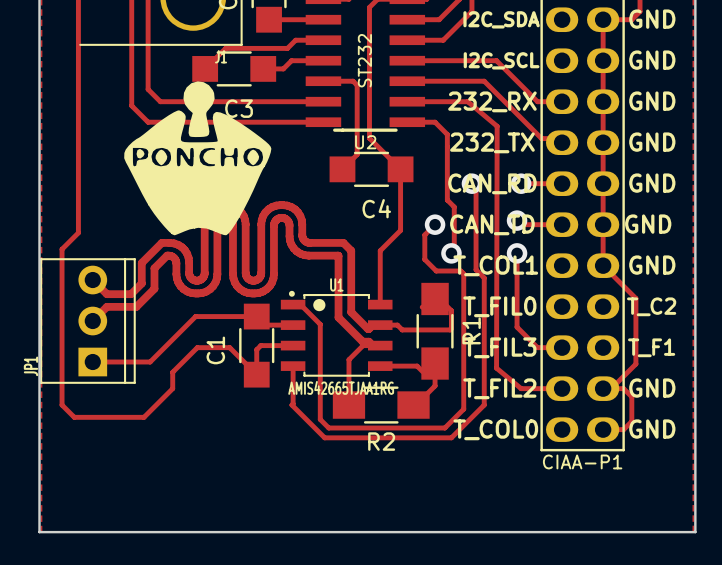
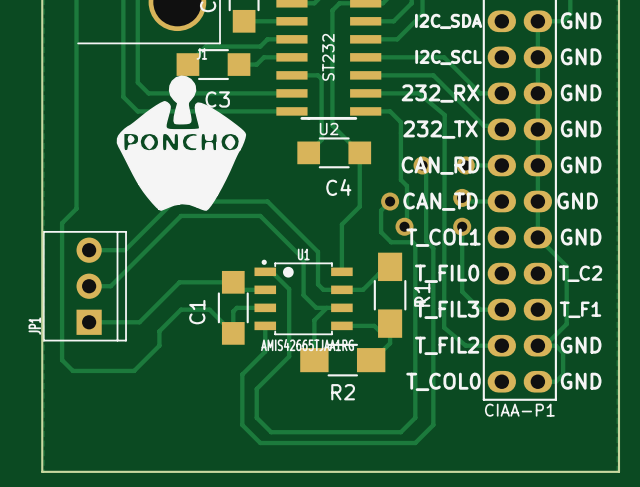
track: (92, 280) (106, 294) (131, 294) (141, 283) (141, 263) (161, 242) (174, 243) (181, 247) (188, 257) (189, 276) (195, 280) (200, 279) (204, 272) (205, 220) (211, 209) (224, 205) (234, 207) (243, 216) (245, 224) (245, 274) (250, 279) (256, 279) (261, 272) (261, 224) (263, 216) (272, 207) (287, 205) (294, 209) (300, 216) (302, 236) (305, 241) (343, 242) (351, 250) (351, 312) (368, 329) (372, 325) -> (89, 250) (125, 250) (173, 201) (267, 201) (318, 251) (318, 284) (323, 289) (335, 289)
track: (435, 298) (439, 298) (451, 310) (450, 329) (402, 329) (397, 325) -> (378, 274) (363, 289) (357, 289)
track: (92, 321) (106, 306) (136, 306) (154, 288) (154, 268) (167, 255) (171, 256) (175, 260) (176, 278) (183, 289) (195, 293) (210, 289) (216, 278) (217, 225) (219, 220) (223, 218) (228, 218) (232, 223) (232, 274) (234, 282) (240, 289) (247, 292) (263, 291) (269, 286) (273, 278) (274, 223) (276, 219) (281, 217) (288, 222) (290, 240) (296, 251) (308, 255) (338, 256) (338, 317) (362, 341) (368, 341) (372, 345) (380, 345) -> (89, 286) (110, 286) (181, 215) (260, 215) (303, 259) (303, 295) (316, 307) (326, 307)
track: (293, 395) (291, 405) (324, 437) (451, 437) (484, 405) -> (265, 351) (242, 374) (242, 425) (260, 443) (415, 443) (433, 425) (433, 360)
track: (320, 400) (320, 419) (328, 428) (444, 428) (463, 409) -> (289, 356) (256, 388) (256, 417) (271, 432) (400, 432) (415, 417) (415, 363)

